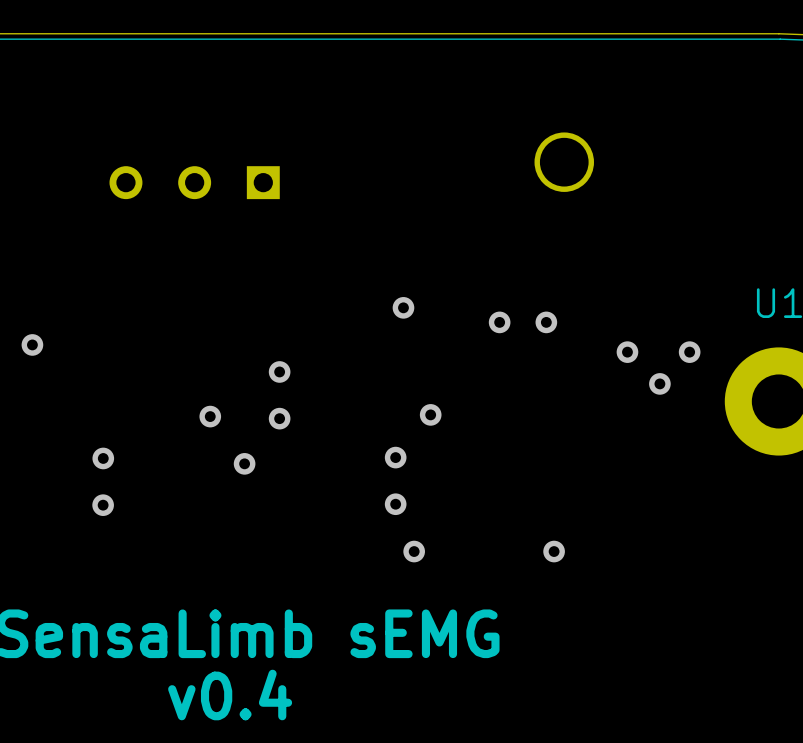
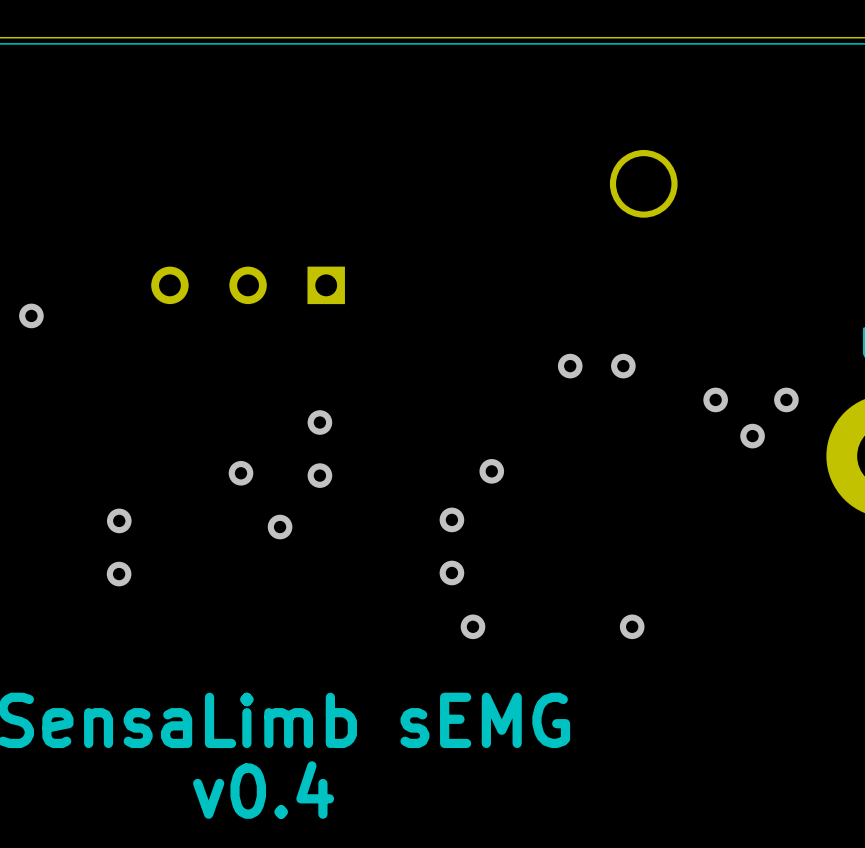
part position: (194, 182) -> (248, 285)
via: none -> (31, 315)
via: (403, 307) -> none
via: (32, 344) -> none

